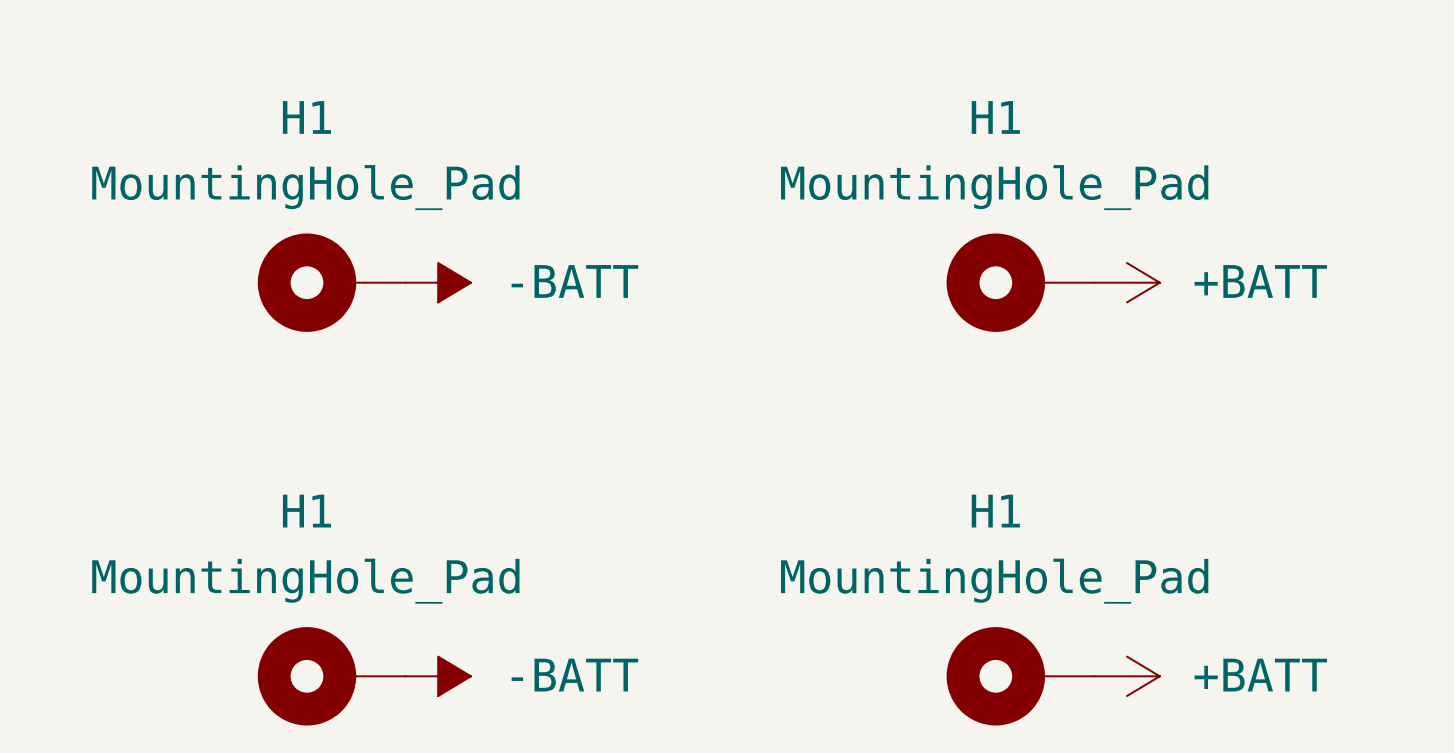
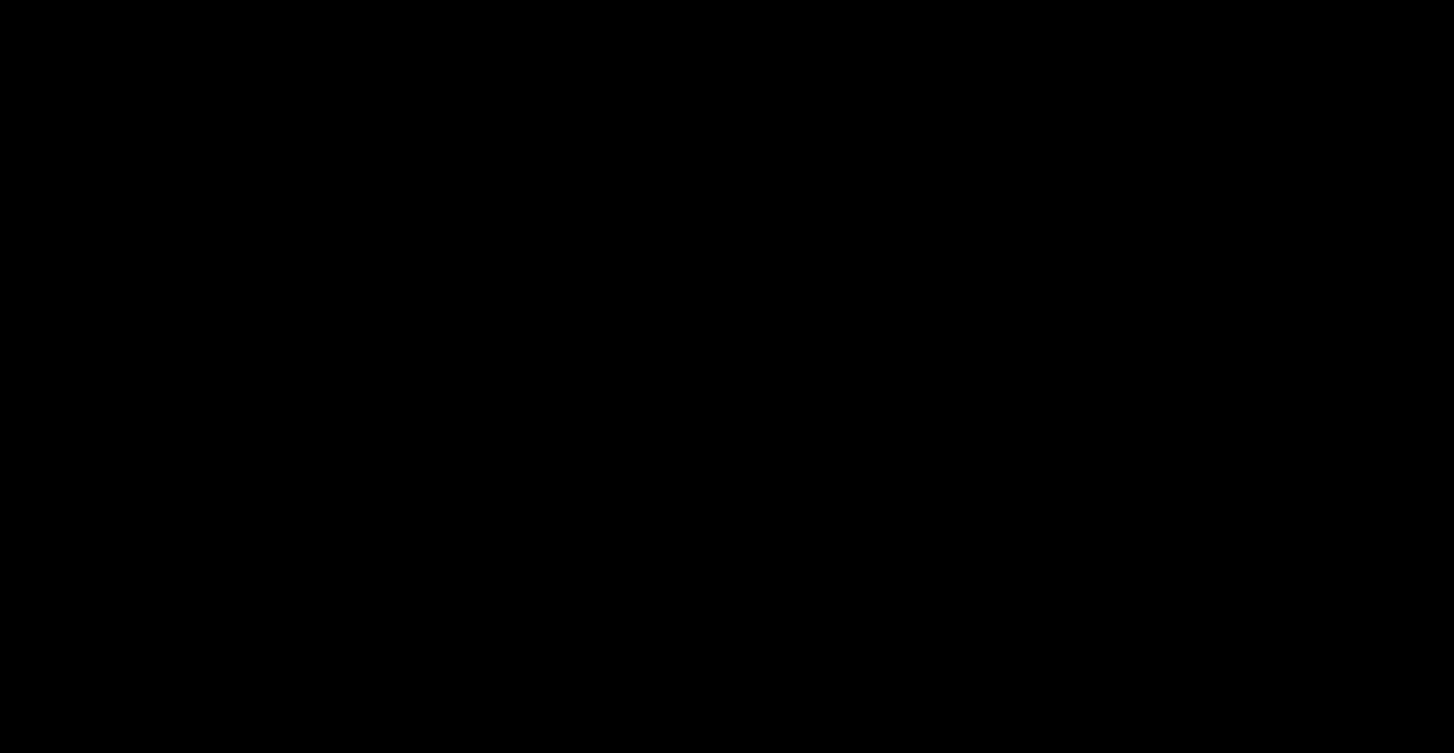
H1: MountingHole_Pad (331, 282) -> none
power symbol: -BATT (438, 282) -> none
H1: MountingHole_Pad (1020, 282) -> none
power symbol: +BATT (1127, 282) -> none
H1: MountingHole_Pad (331, 676) -> none
power symbol: -BATT (438, 676) -> none
H1: MountingHole_Pad (1020, 676) -> none
power symbol: +BATT (1127, 676) -> none

